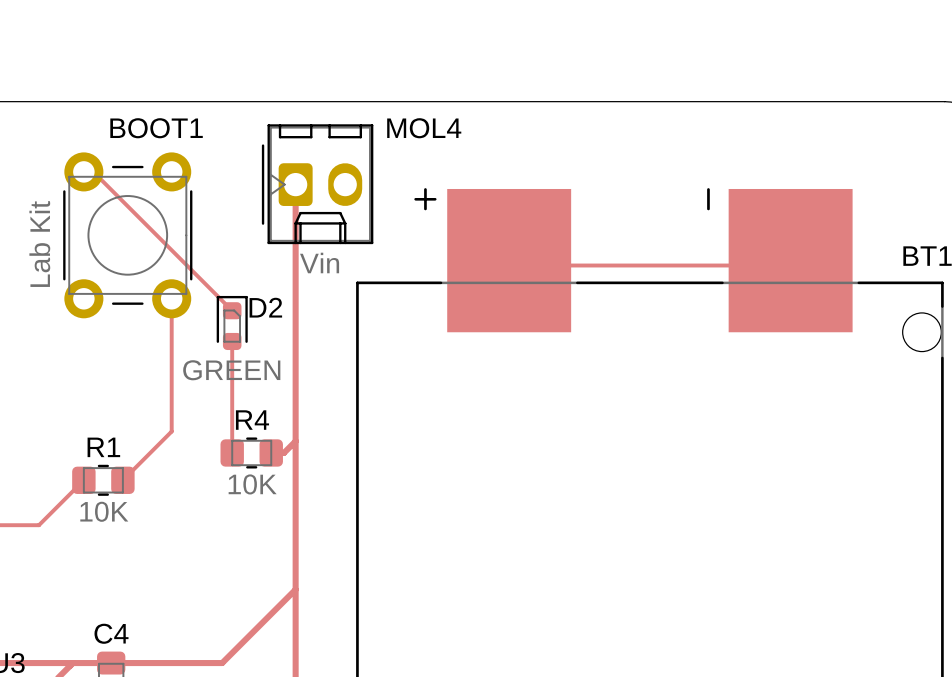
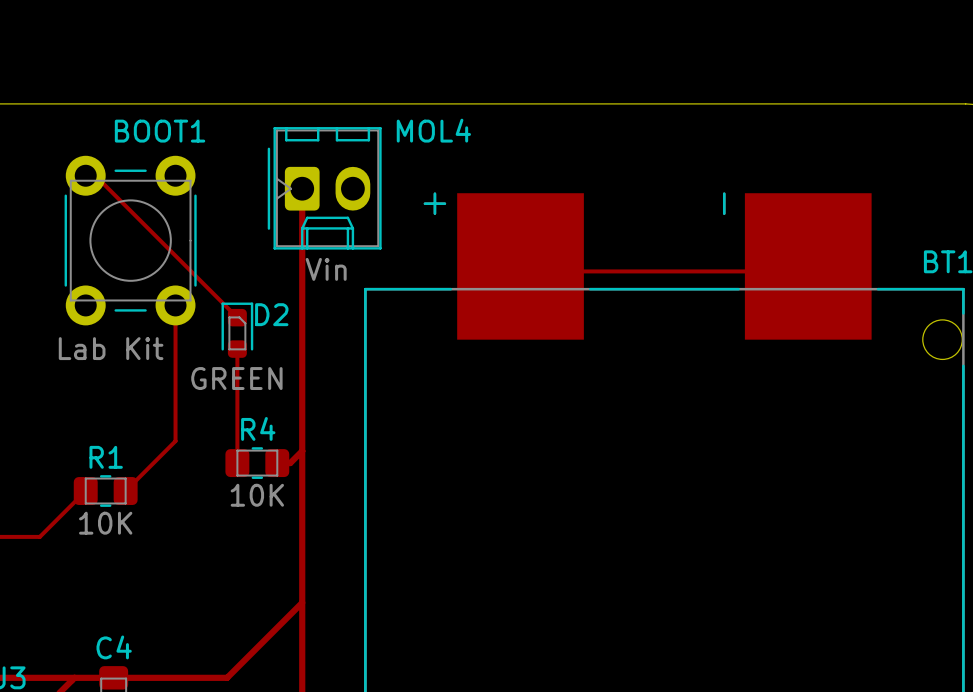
BOOT1 value rotation: 0° (39, 244) -> 90° clockwise (111, 348)

